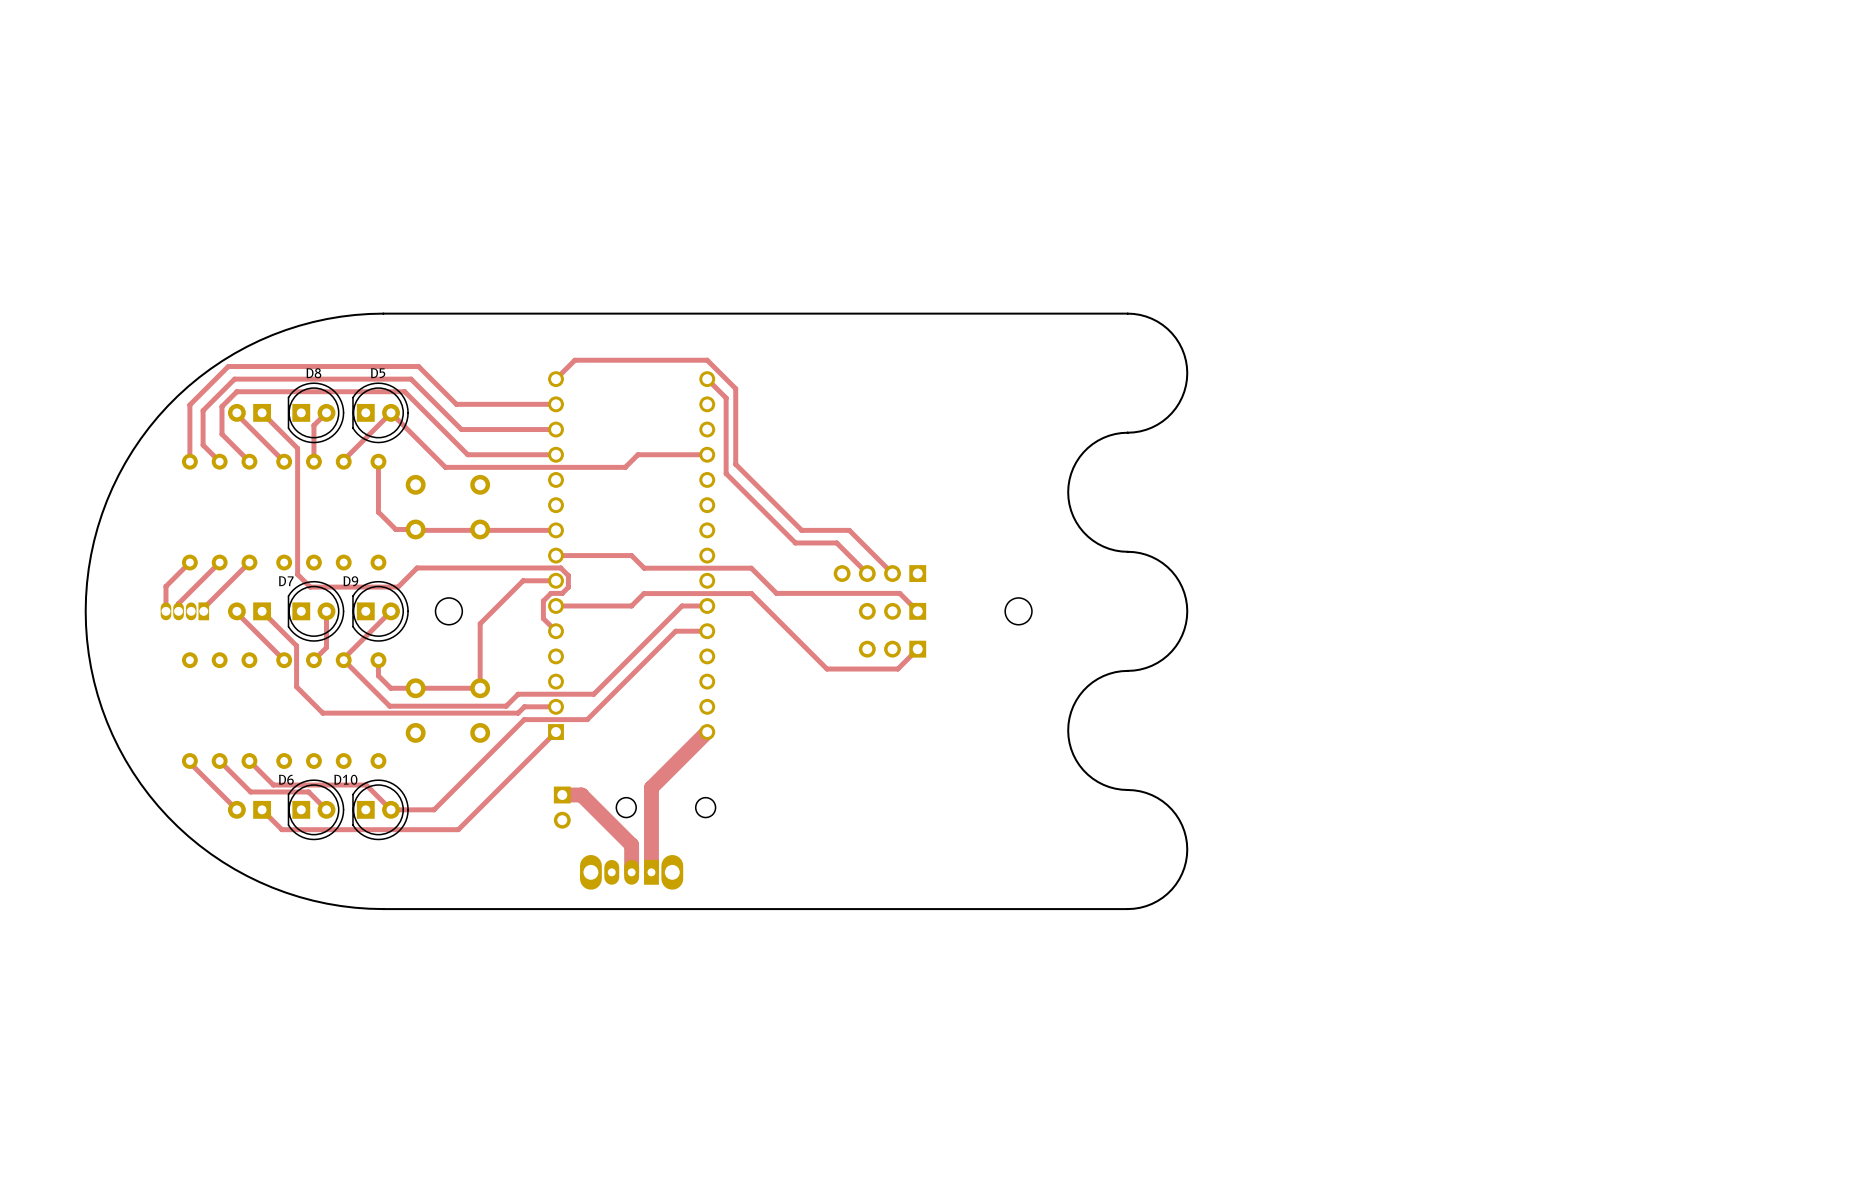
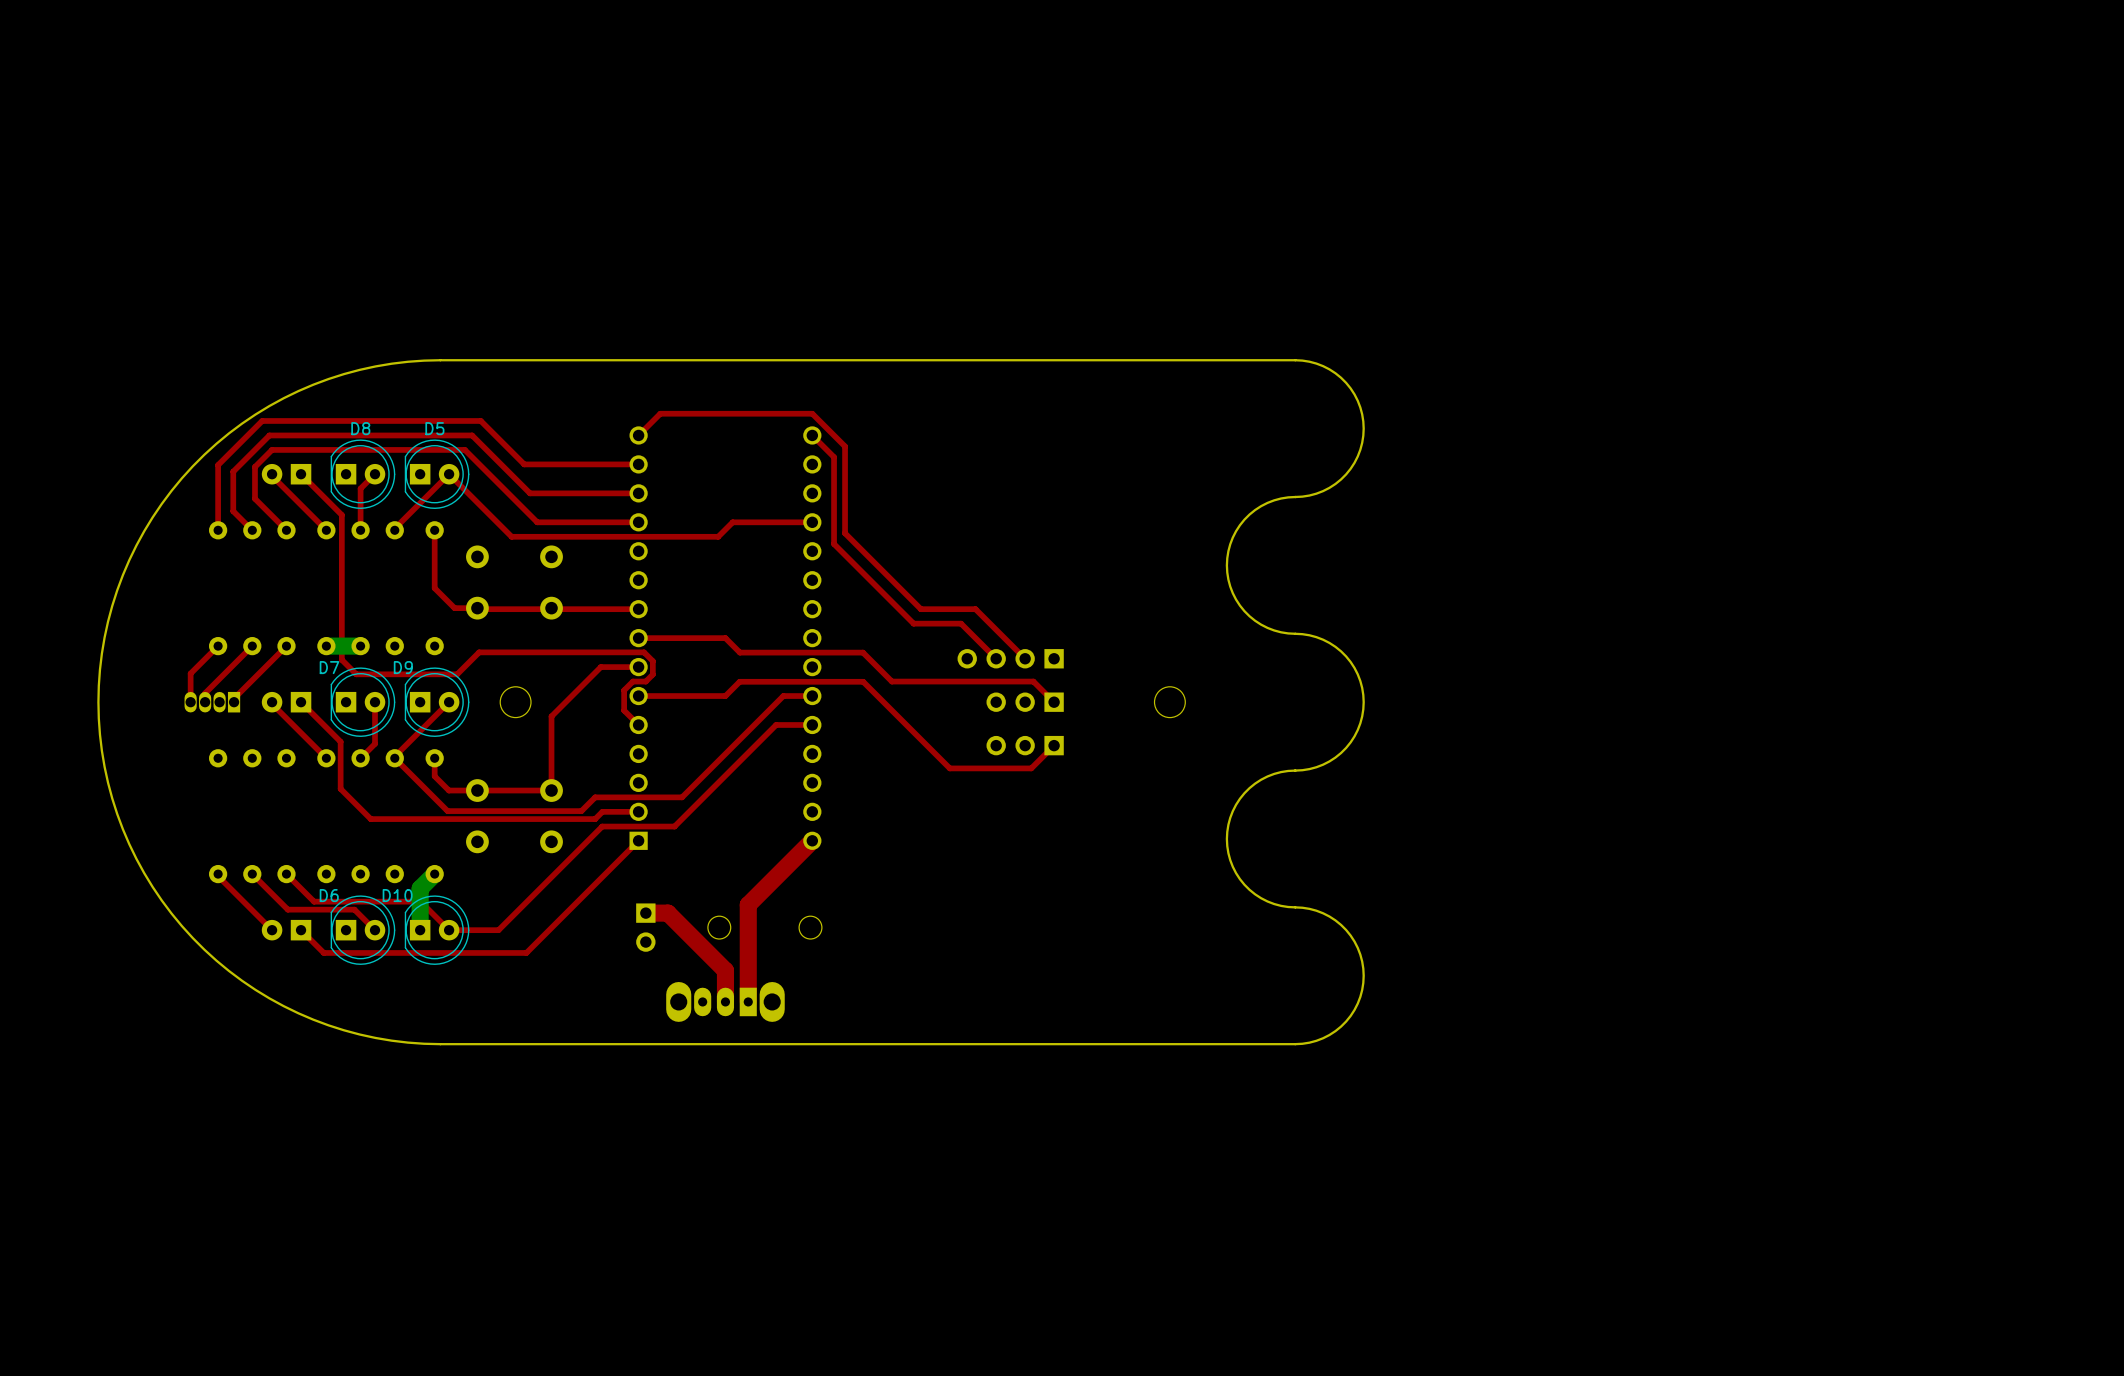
bottom track: none -> (360, 646) (326, 646)
bottom track: none -> (434, 874) (420, 888) (420, 930)

